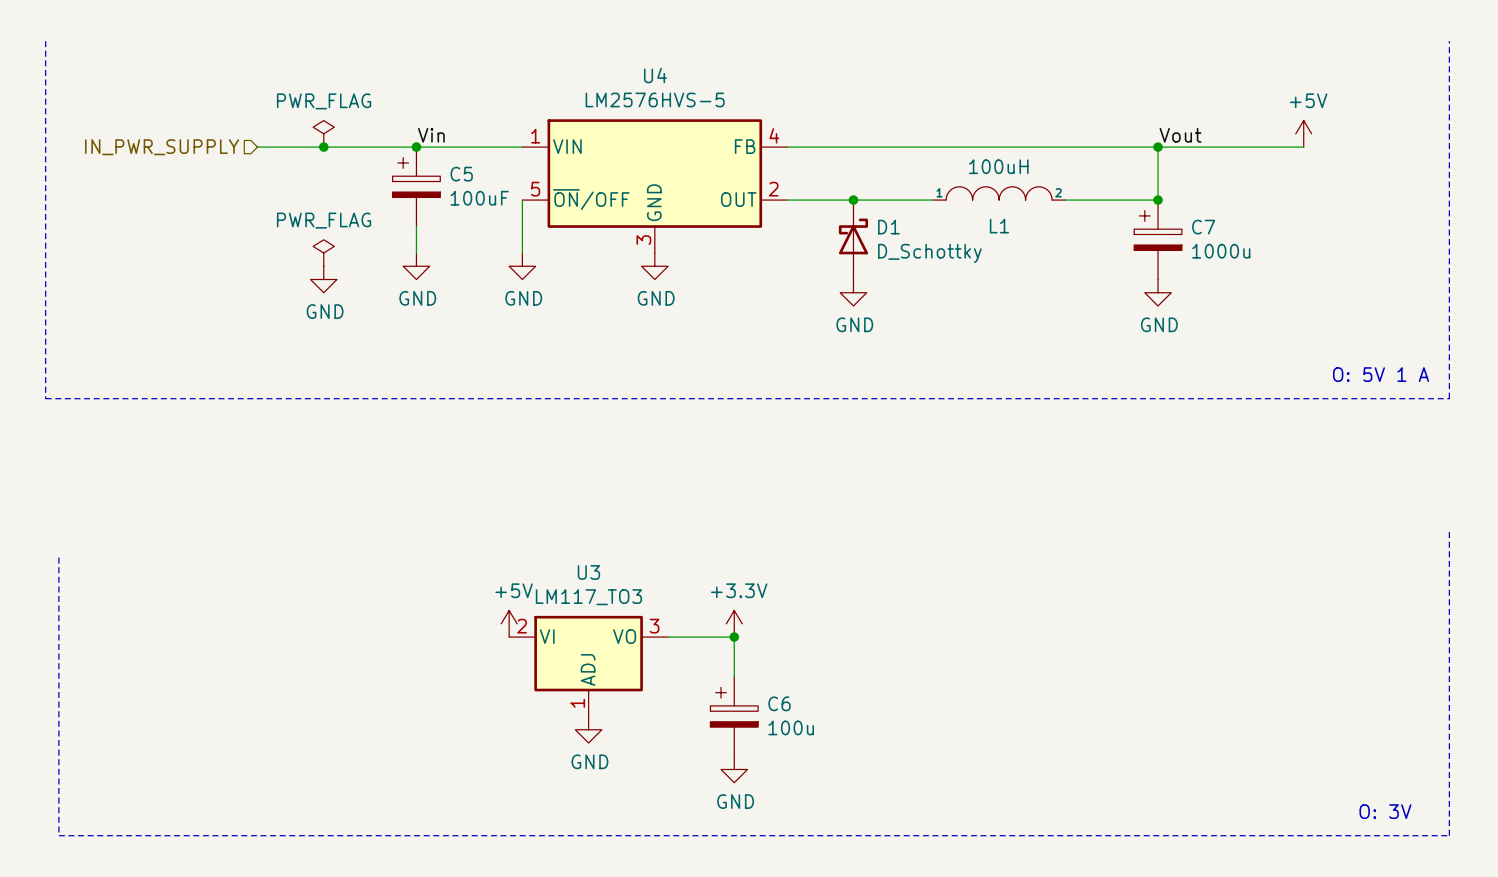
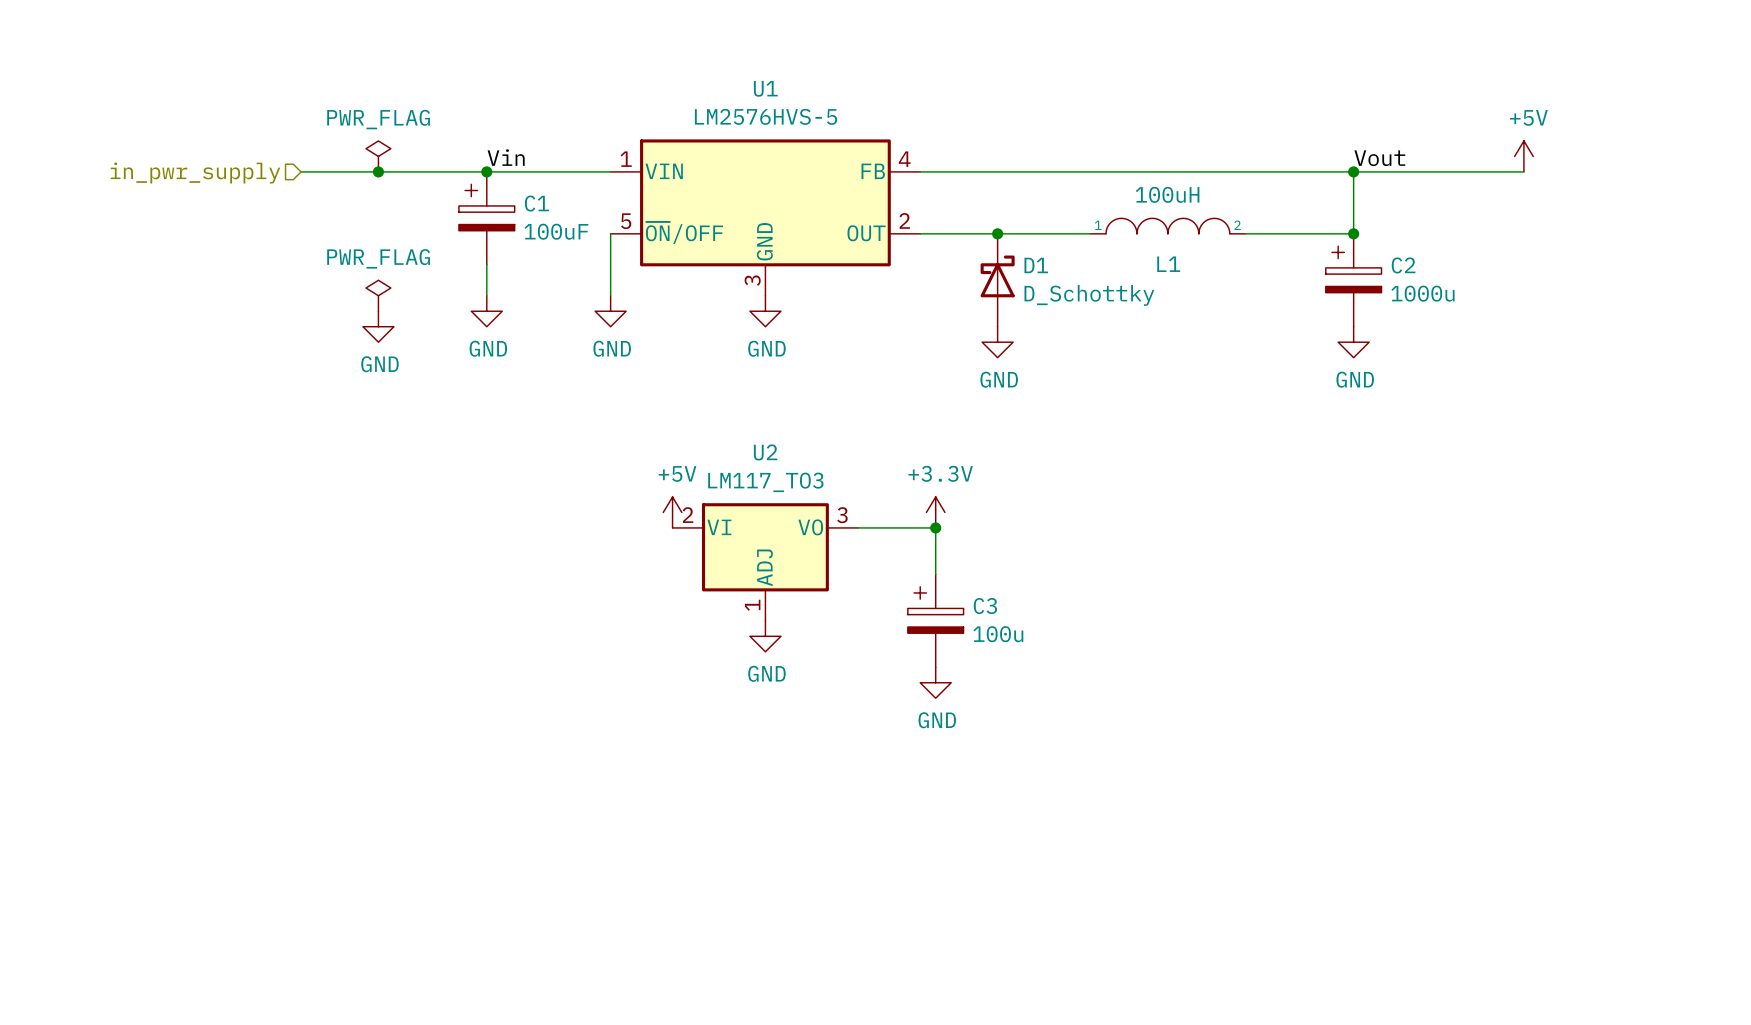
line: (45, 41) (45, 398) (1449, 398) (1449, 41) -> none
U4 name: U4 (655, 75) -> U1 (765, 88)
hierarchical label: IN_PWR_SUPPLY (162, 147) -> in_pwr_supply (195, 173)
C5 name: C5 (461, 174) -> C1 (536, 203)
C7 name: C7 (1203, 227) -> C2 (1403, 265)
text: O: 5V 1 A (1381, 374) -> none
junction: none -> (935, 527)
U2: none -> LM117_TO3 (765, 562)
C3: none -> 100u (935, 620)
line: (1449, 531) (1449, 835) (58, 835) (58, 557) -> none
power symbol: none -> GND (765, 636)
power symbol: none -> GND (935, 682)
power symbol position: +5V (509, 623) -> +5V (672, 512)
power symbol position: +3.3V (734, 623) -> +3.3V (935, 512)
wire: (668, 637) (734, 637) (734, 676) -> (858, 527) (935, 527) (935, 574)
junction: (734, 637) -> none
U3: LM117_TO3 (588, 666) -> none
C6: 100u (734, 716) -> none
power symbol: GND (588, 729) -> none
power symbol: GND (734, 769) -> none
text: O: 3V (1385, 811) -> none

